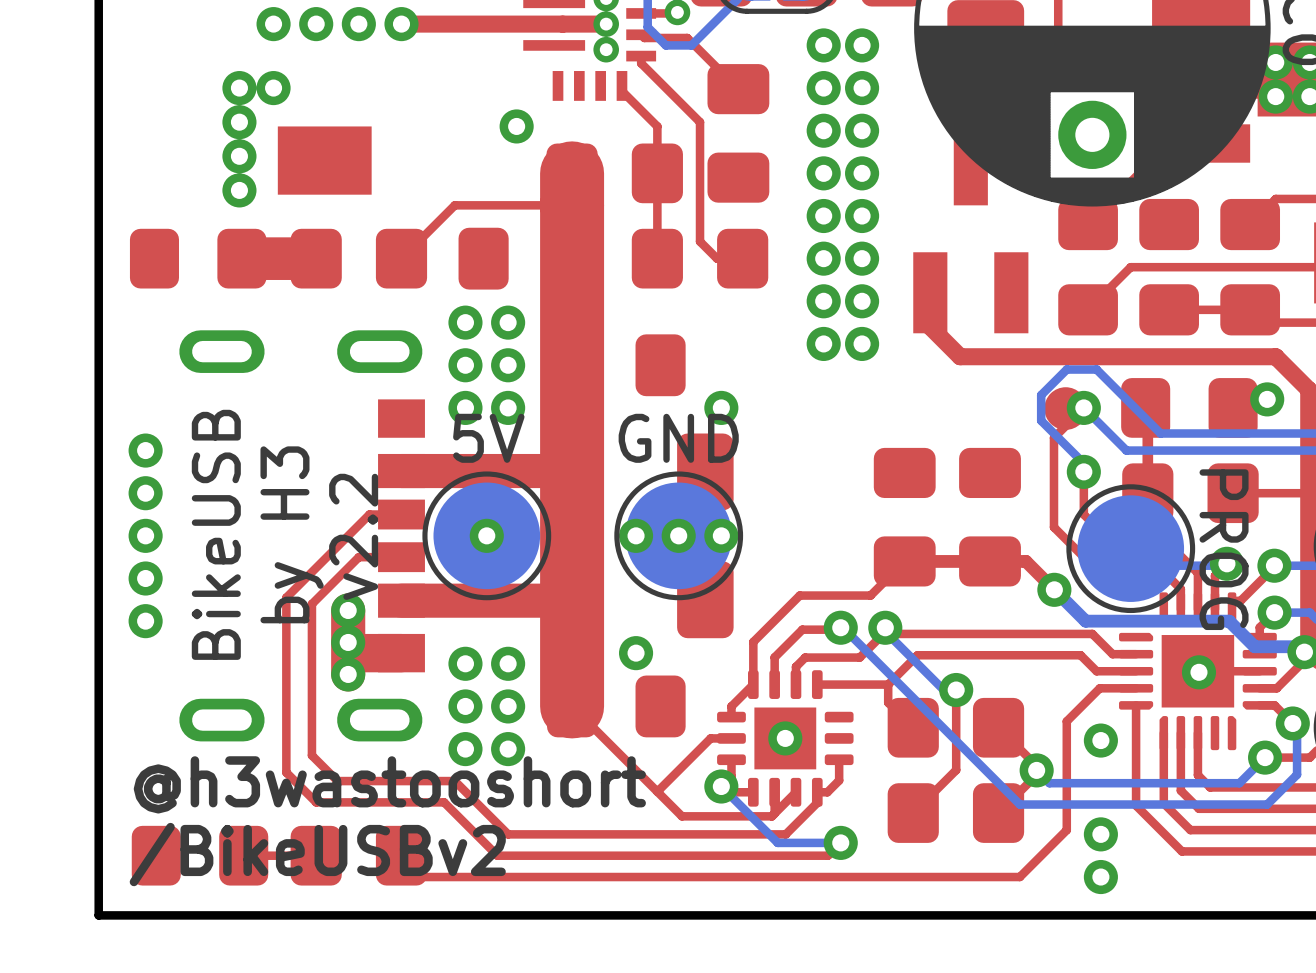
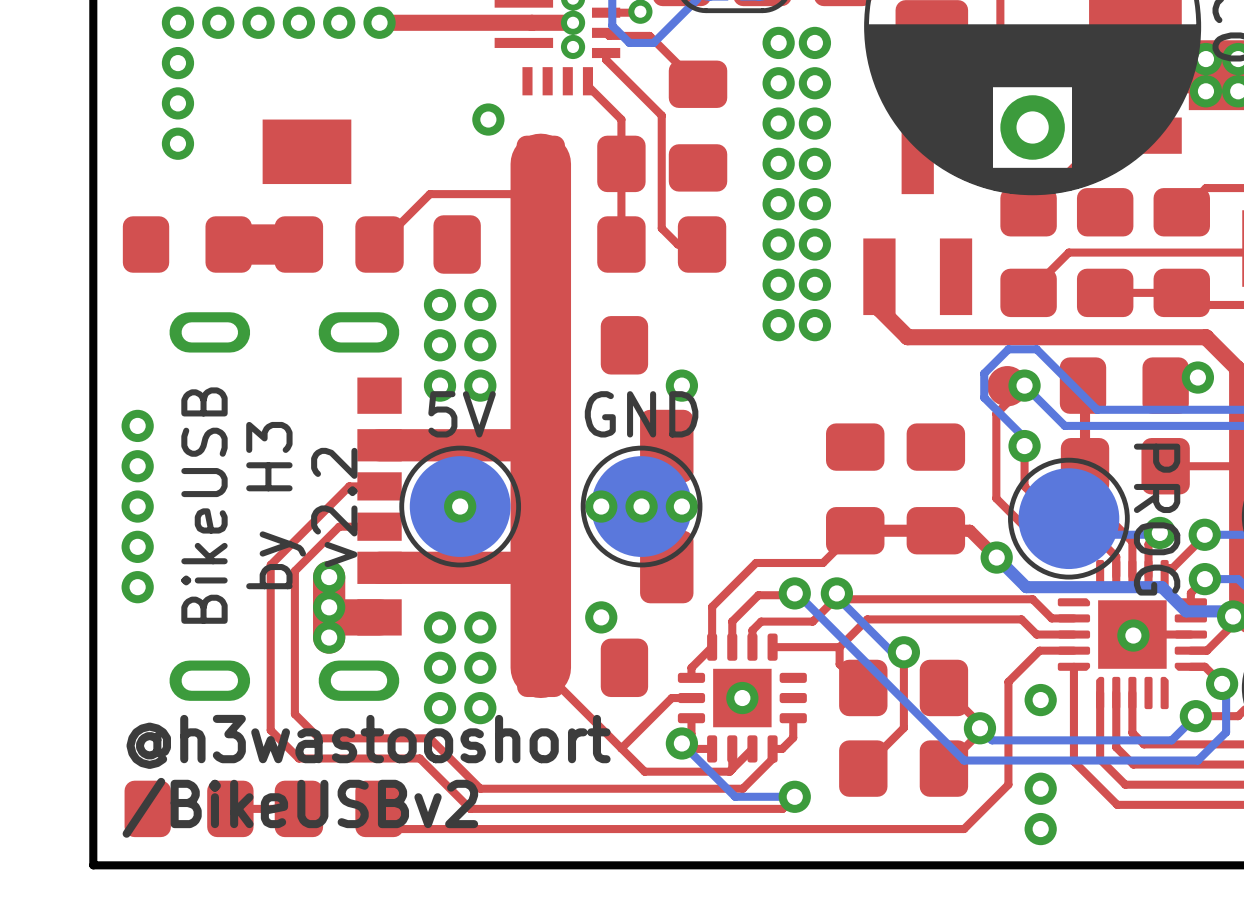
via: none -> (177, 22)
via: none -> (218, 22)
via: none -> (177, 63)
via: (239, 88) -> none
via: (273, 88) -> none
via: none -> (177, 103)
via: (239, 122) -> none
via: none -> (177, 143)
via: (239, 156) -> none
via: (239, 190) -> none

